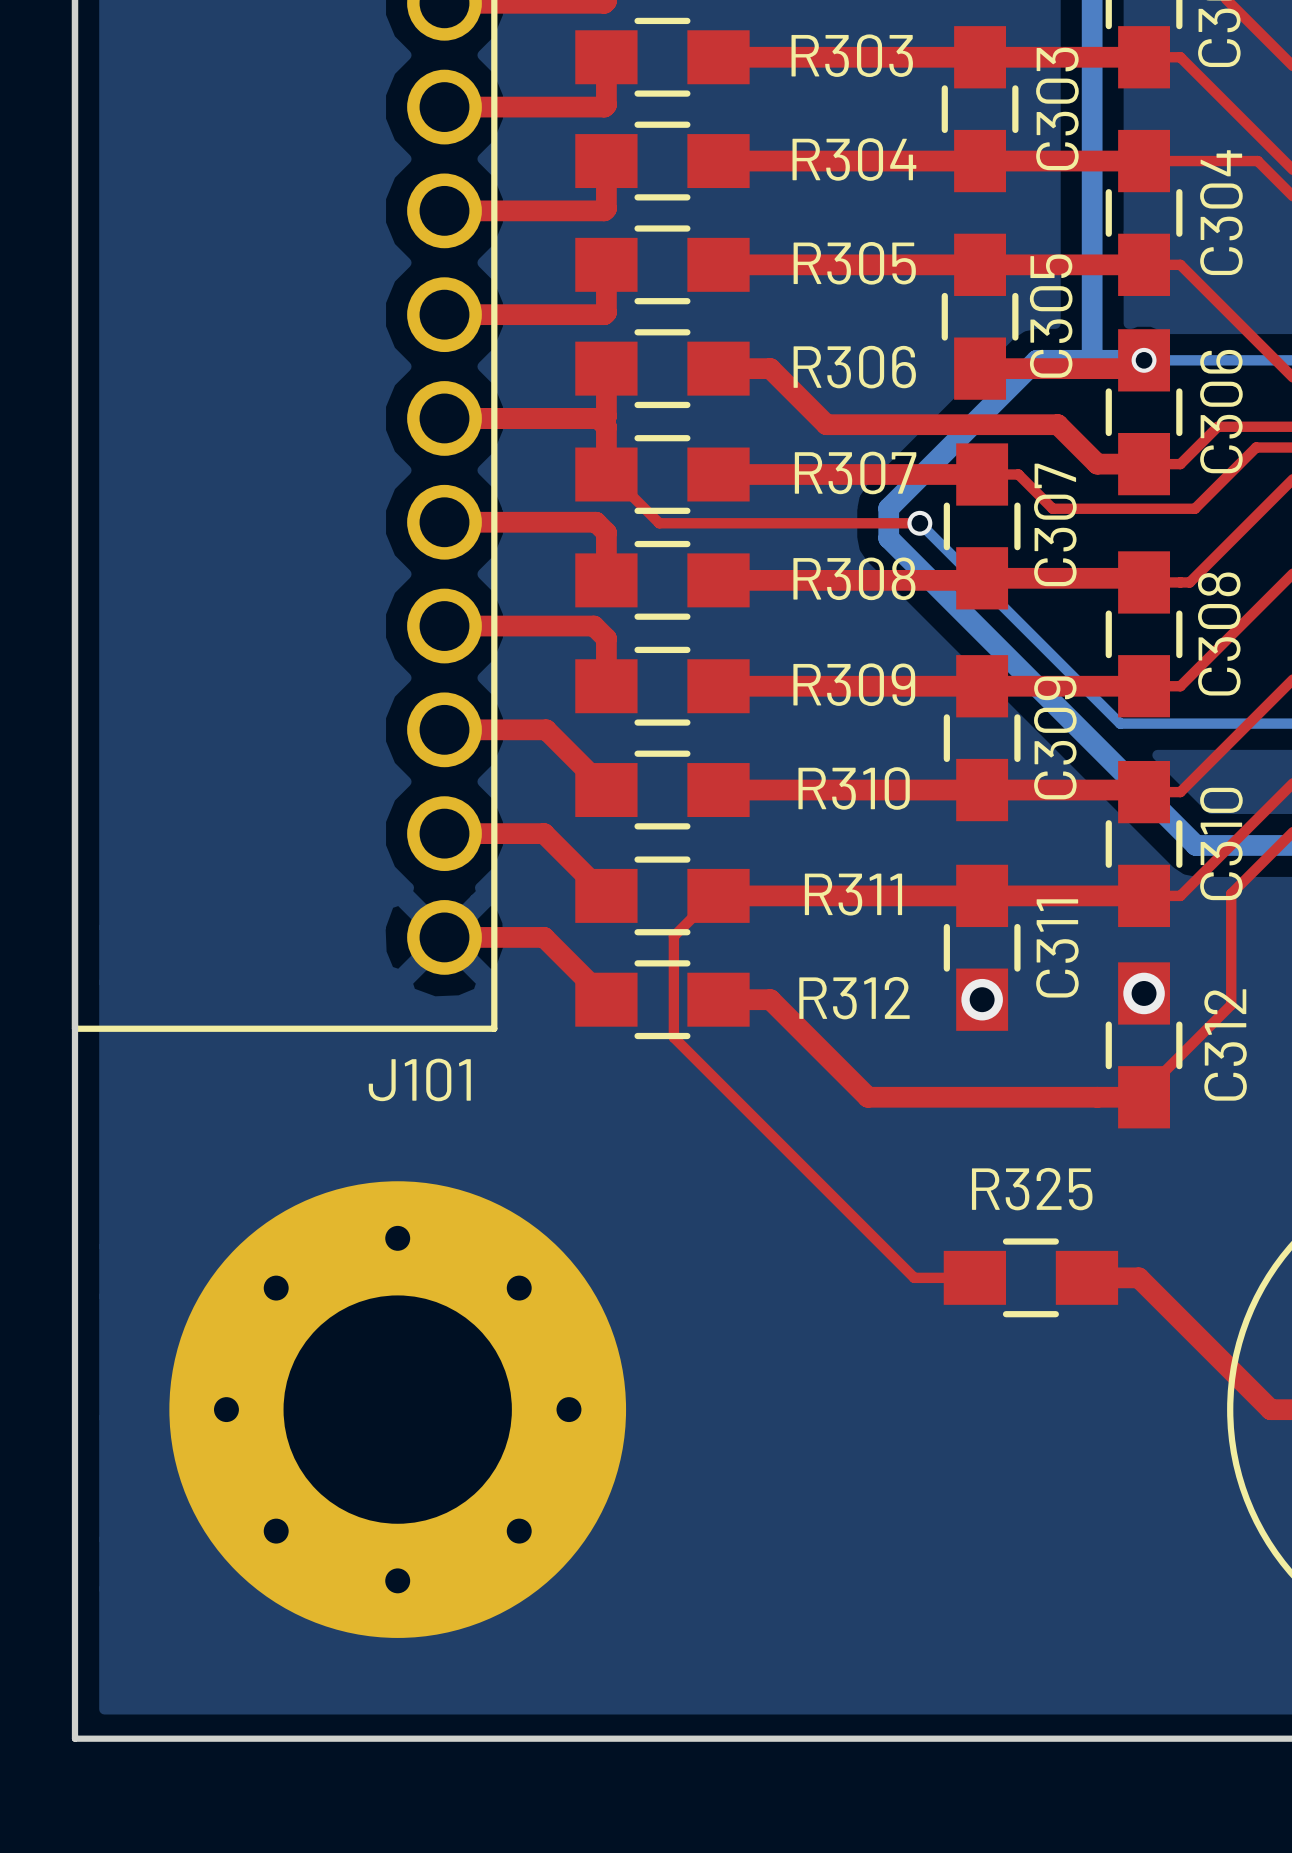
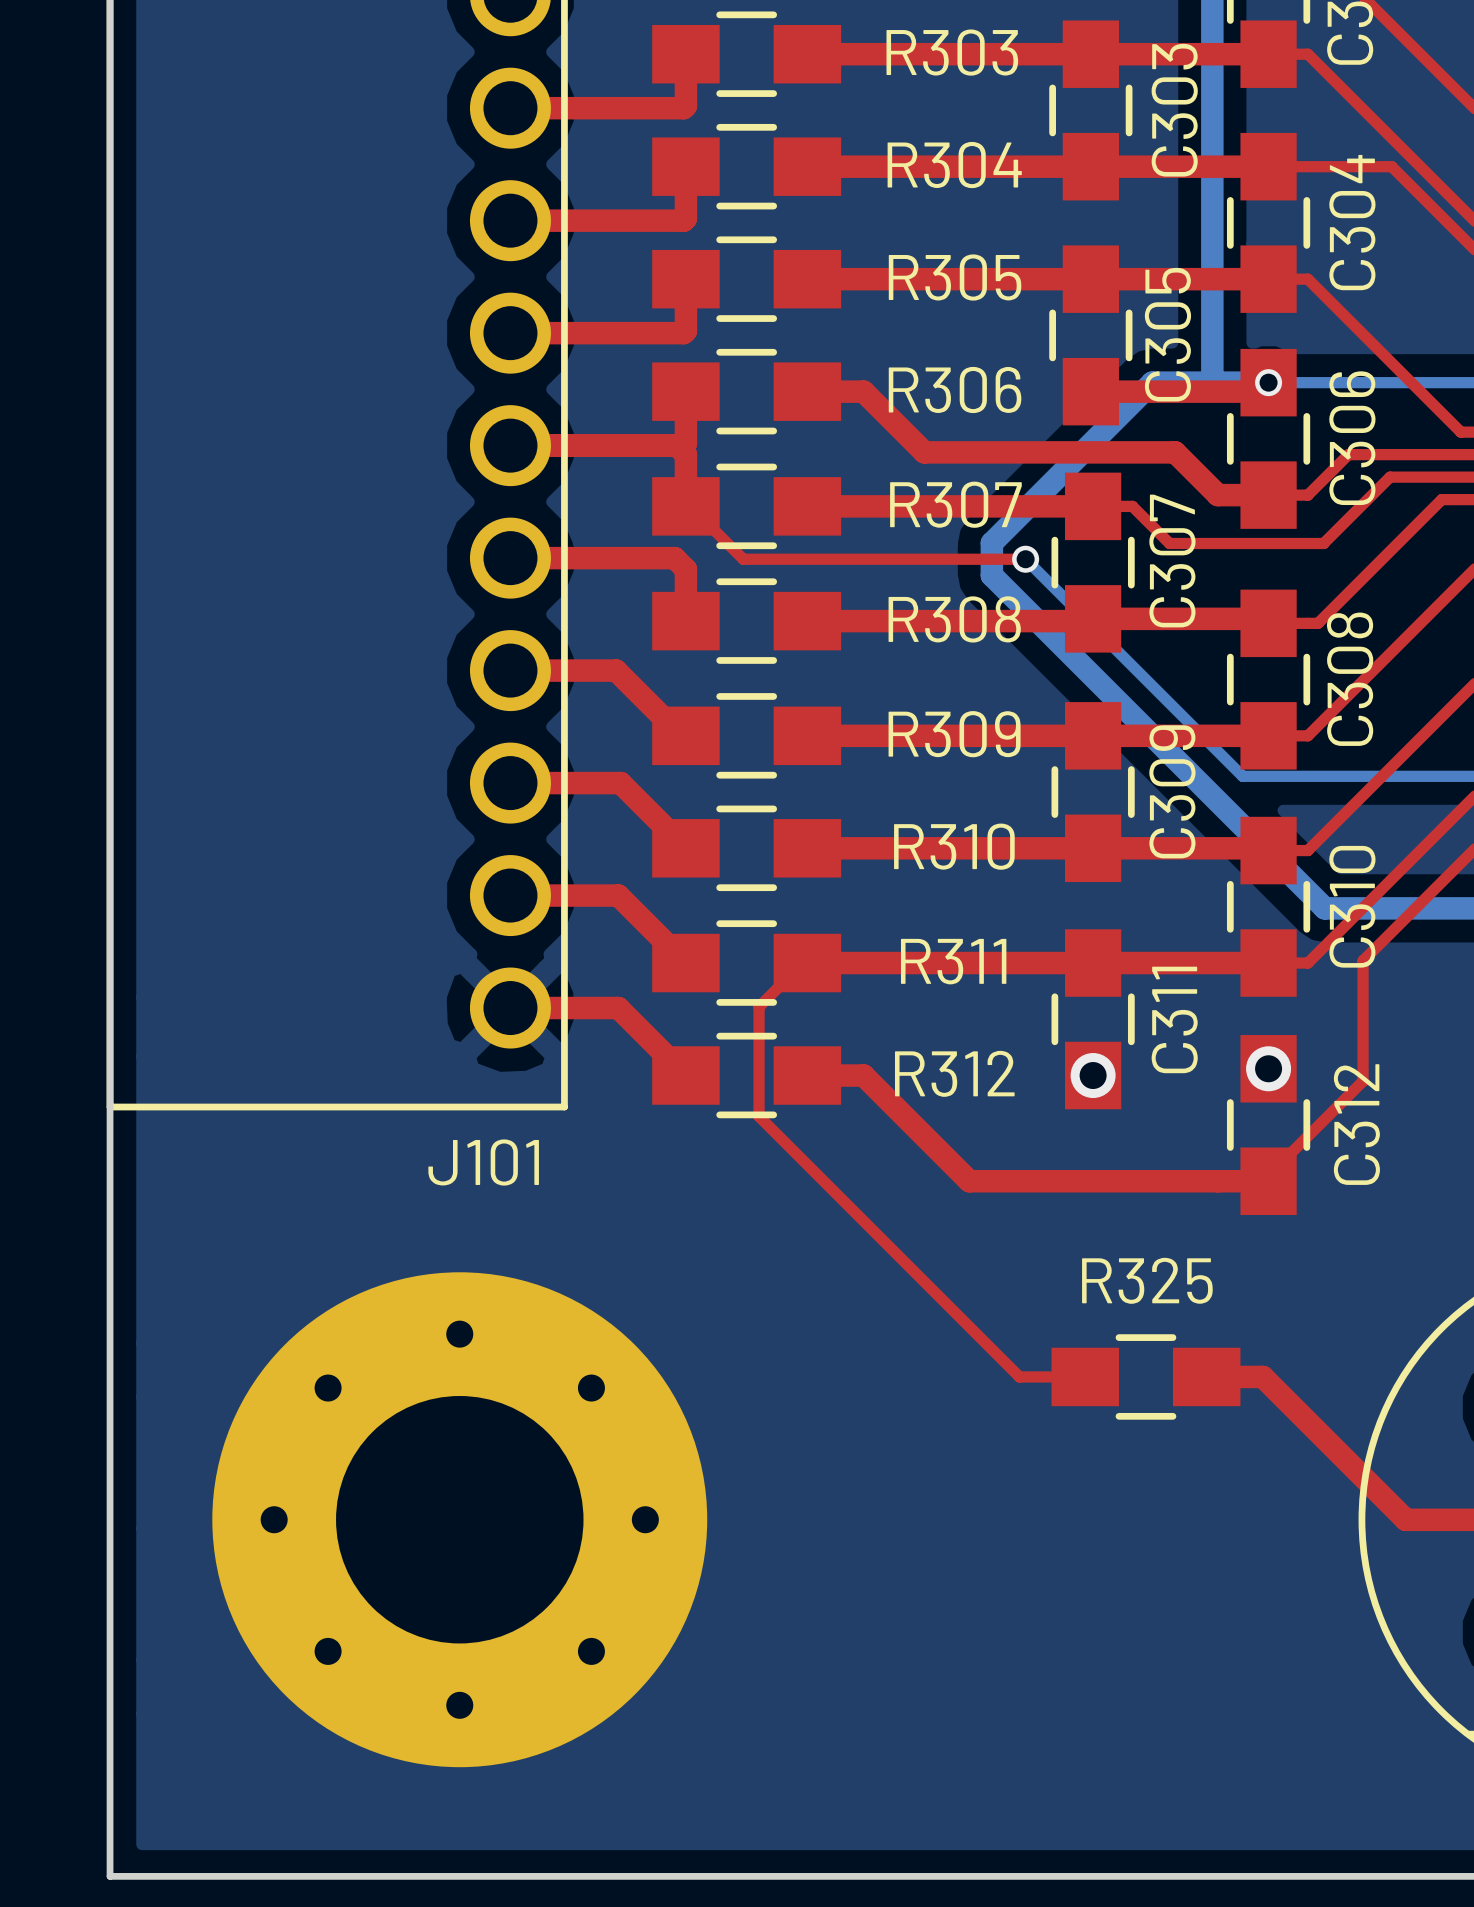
top track: (542, 626) (593, 626) (606, 638) (606, 686) -> (616, 670) (681, 735) (685, 735)

